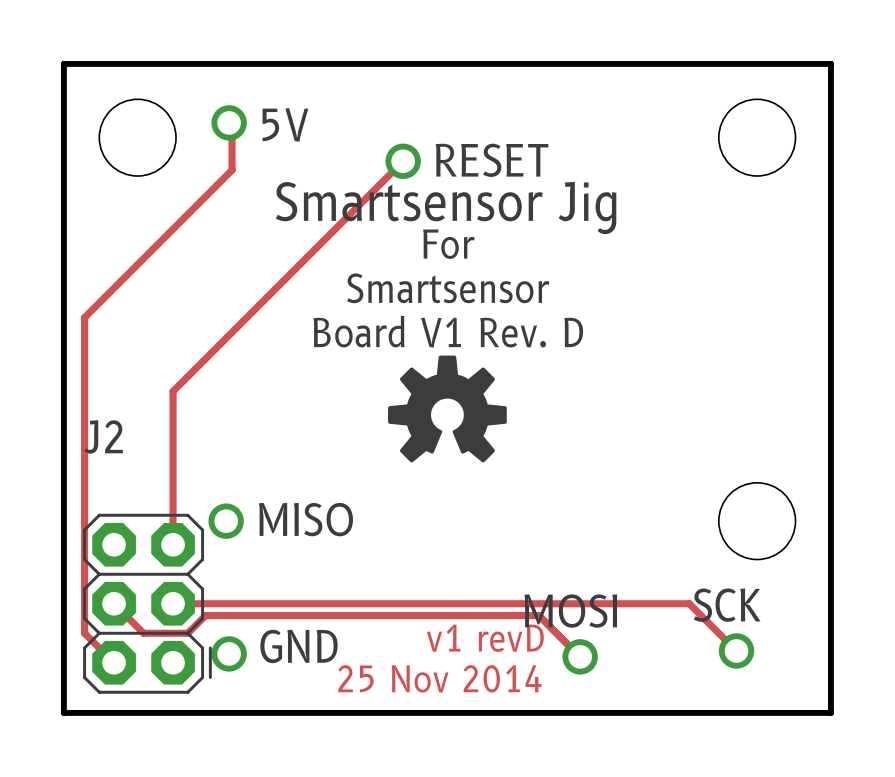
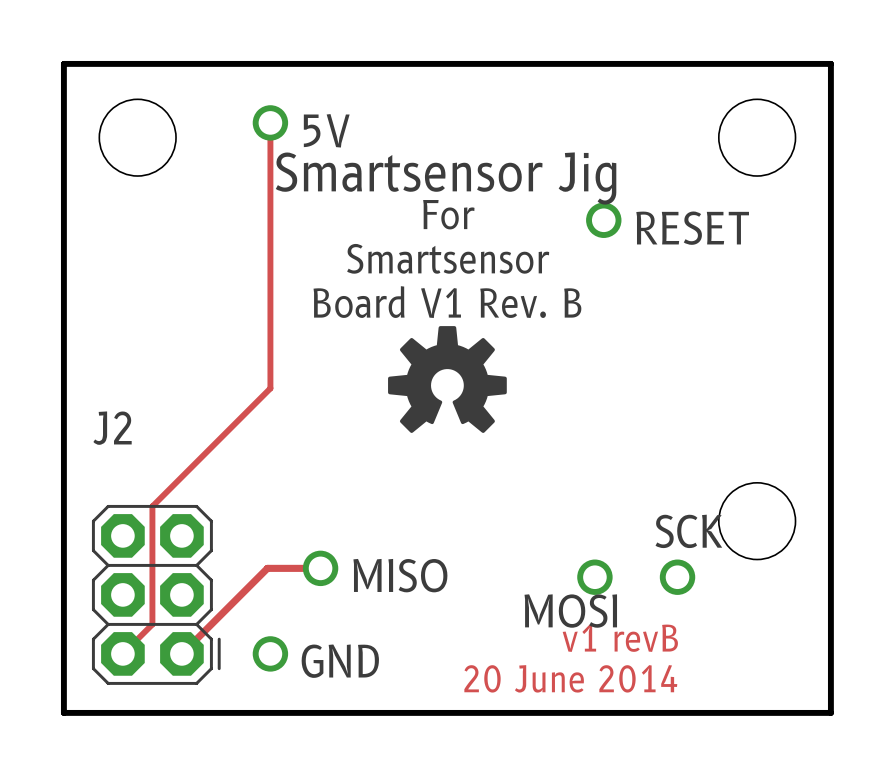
track: (229, 122) (232, 125) (232, 170) (84, 317) (84, 633) (114, 662) -> none
5V position: (229, 122) -> (270, 122)
track: none -> (270, 122) (270, 388) (152, 506) (152, 624) (122, 653)
5V name position: 5V (285, 124) -> 5V (326, 130)
RESET name position: RESET (492, 160) -> RESET (692, 228)
track: (403, 161) (173, 391) (173, 544) -> none
RESET position: (403, 161) -> (603, 220)
text position: Smartsensor Jig (446, 208) -> Smartsensor Jig (446, 178)
text position: For (448, 244) -> For (448, 214)
text position: Smartsensor (448, 288) -> Smartsensor (448, 258)
text: Board V1 Rev. D (448, 331) -> Board V1 Rev. B (447, 302)
drawing position: (447, 409) -> (447, 379)
MISO name position: MISO (306, 519) -> MISO (400, 575)
MISO position: (226, 521) -> (320, 568)
track: none -> (320, 568) (267, 568) (181, 653)
track: (114, 603) (143, 633) (187, 633) (205, 615) (538, 615) (580, 656) -> none
J2 position: (147, 603) -> (156, 594)
track: (173, 603) (689, 603) (736, 650) -> none
SCK name position: SCK (727, 605) -> SCK (688, 531)
text: v1 revD (485, 638) -> v1 revB (620, 638)
GND name position: GND (299, 646) -> GND (340, 661)
SCK position: (736, 650) -> (677, 577)
GND position: (229, 653) -> (270, 653)
MOSI position: (580, 656) -> (594, 577)
text: 25 Nov 2014 (439, 678) -> 20 June 2014 (570, 678)

